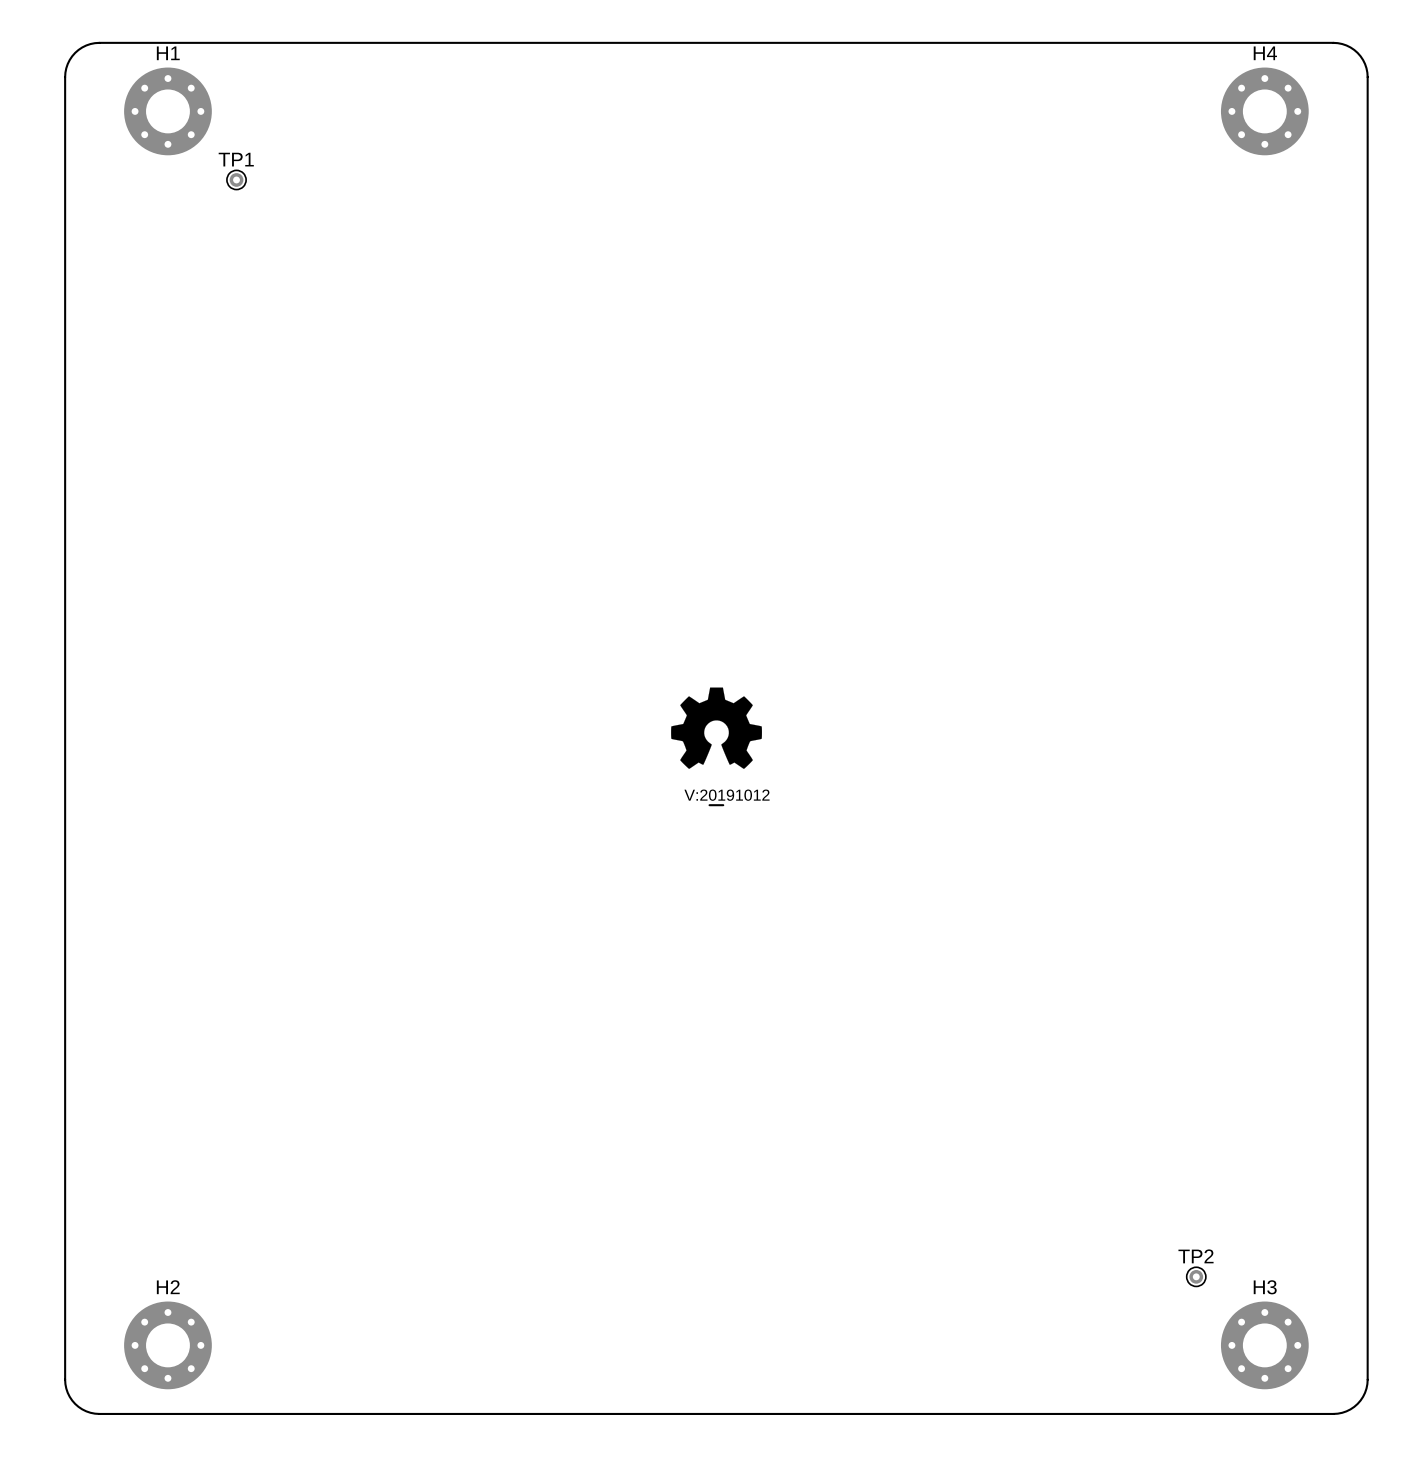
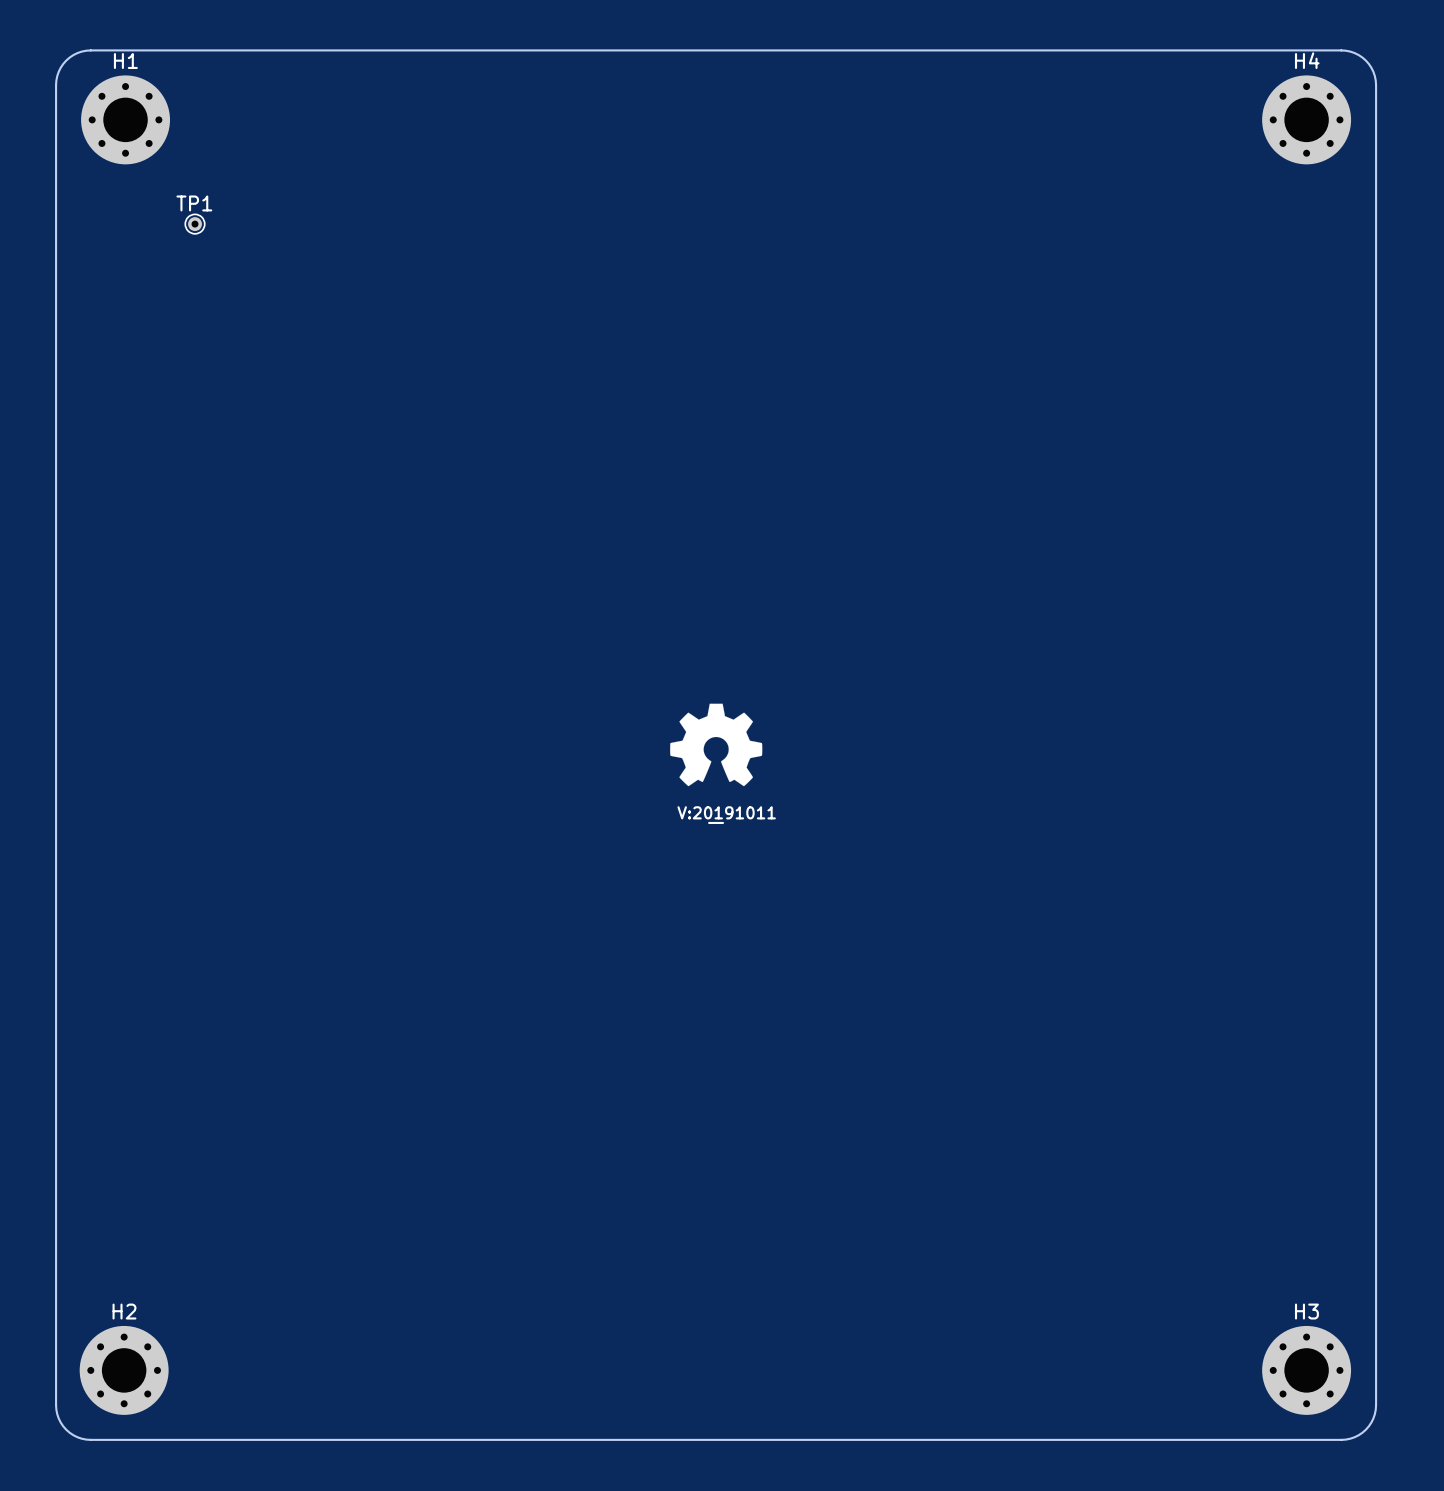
H1 position: (167, 111) -> (125, 119)
H4 position: (1264, 111) -> (1306, 119)
TP1 position: (236, 179) -> (195, 224)
drawing shape: [684, 789, 770, 807] -> [677, 806, 776, 825]
TP2: (1196, 1276) -> none
H2 position: (167, 1345) -> (124, 1370)
H3 position: (1264, 1345) -> (1306, 1370)

